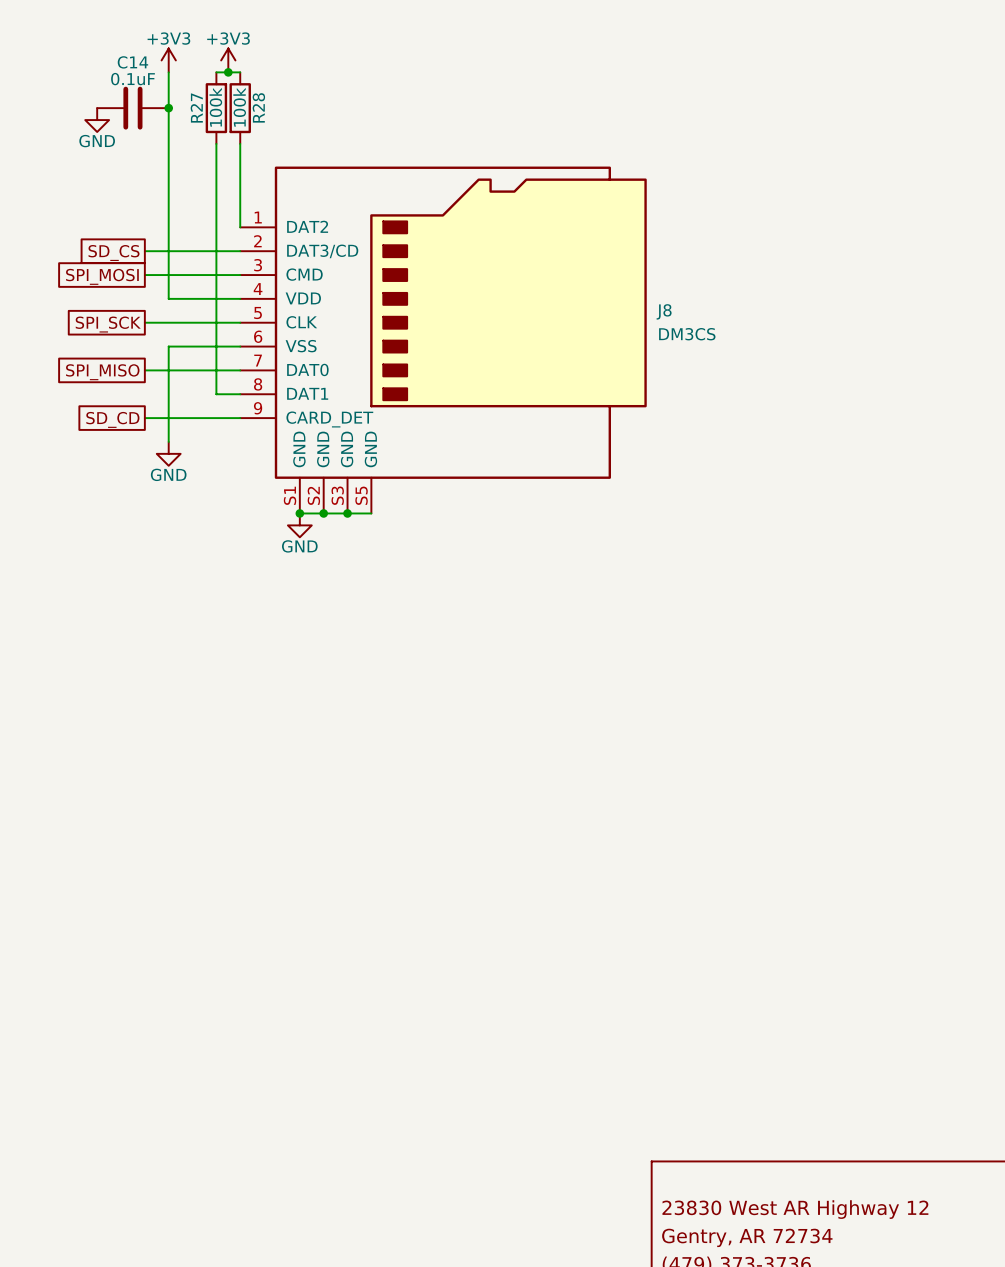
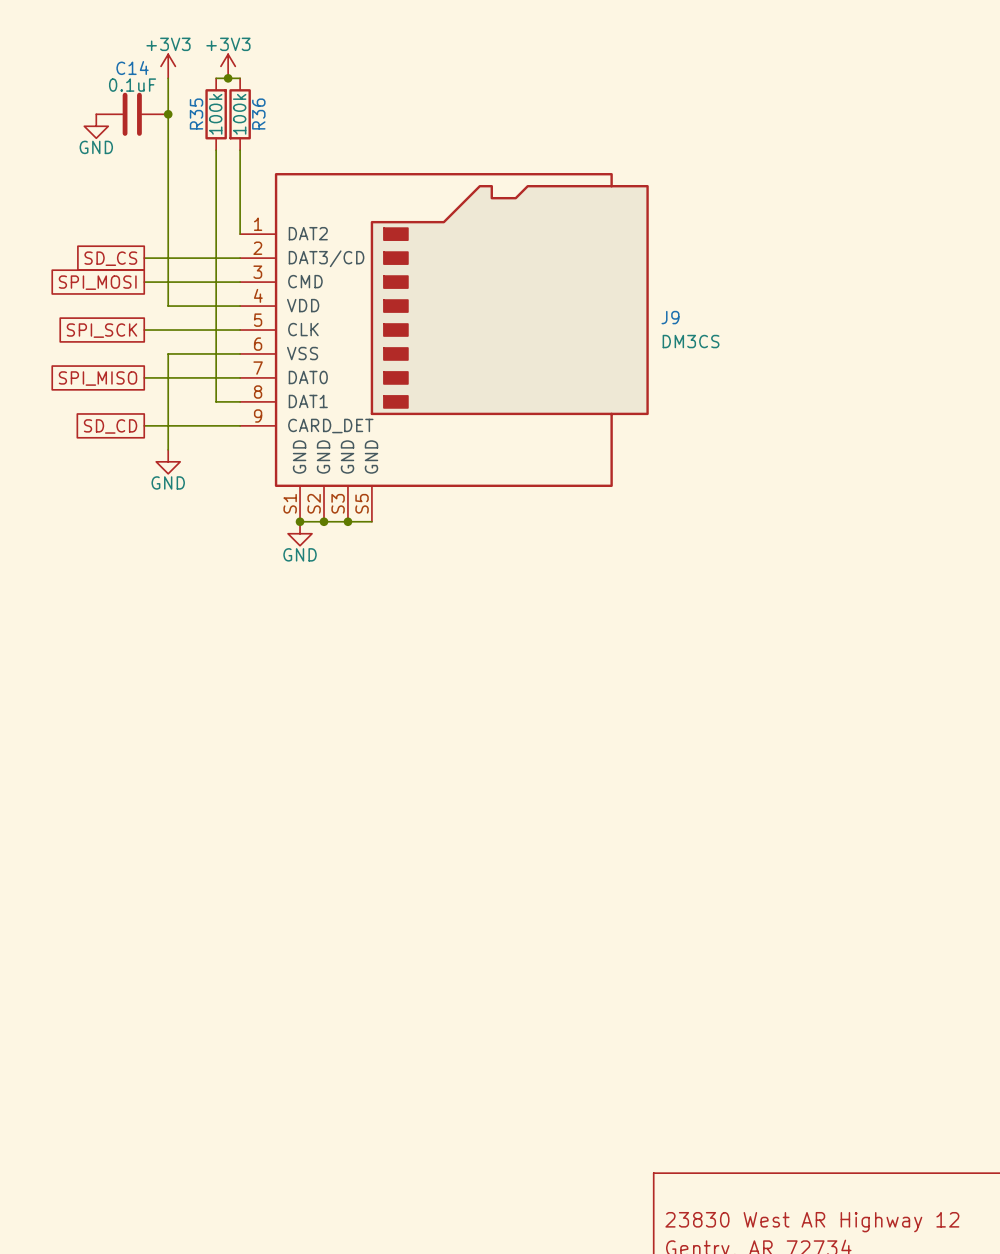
R28 name: R28 (258, 107) -> R36 (258, 114)
R27 name: R27 (196, 108) -> R35 (196, 114)
J8 name: J8 (664, 311) -> J9 (670, 317)

